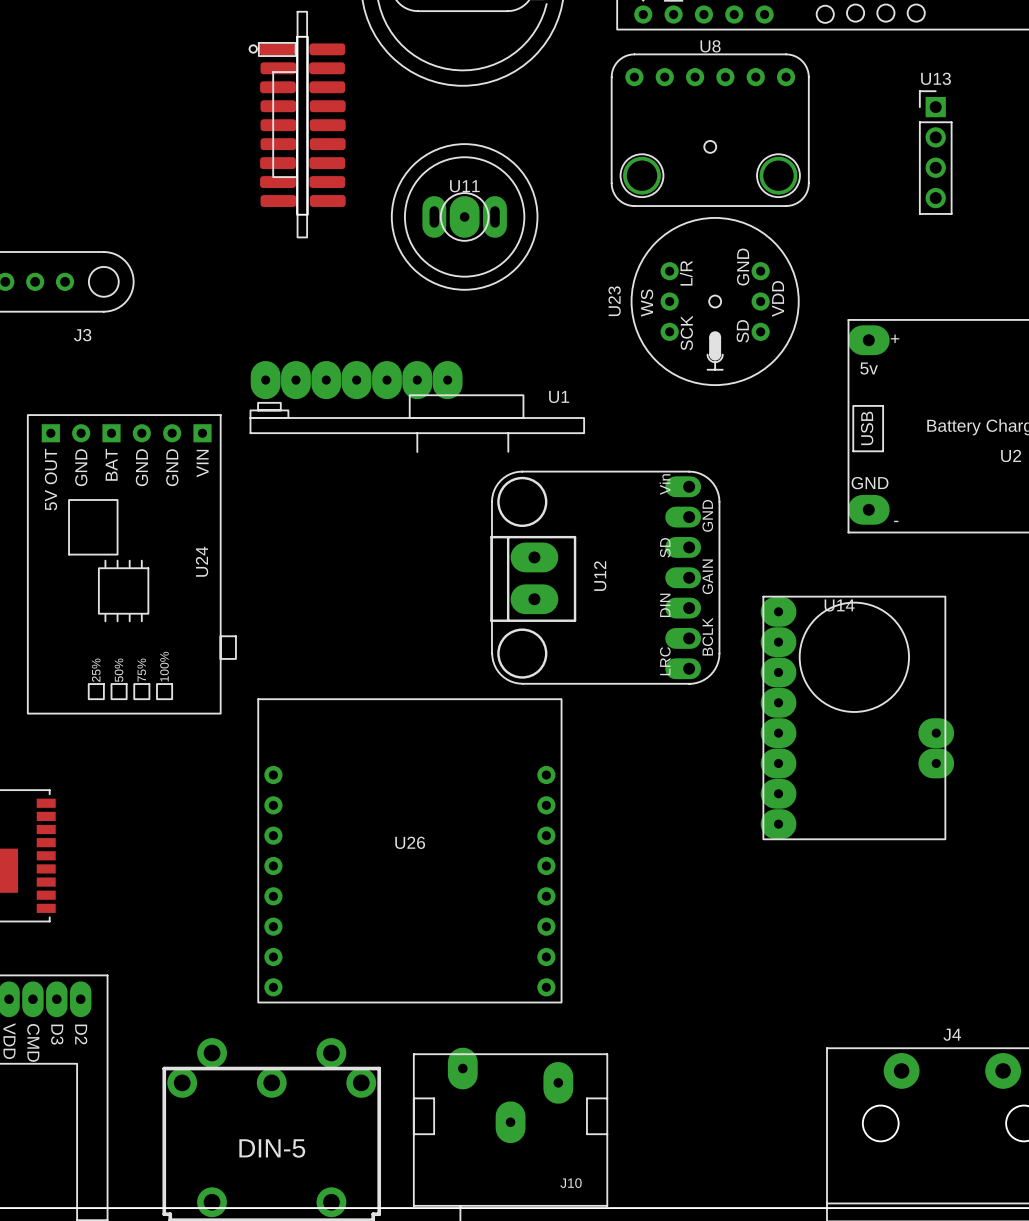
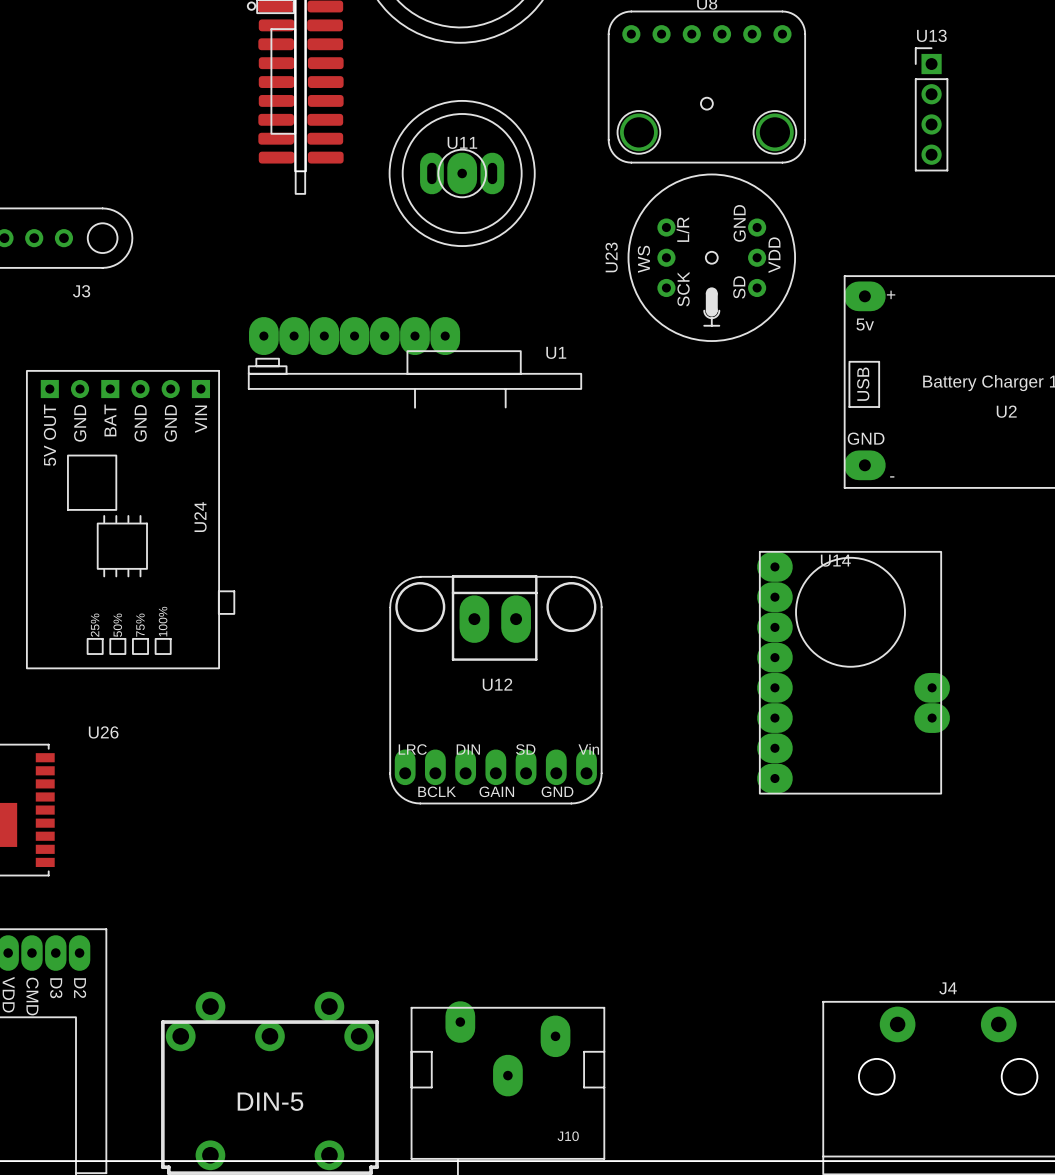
U12 rotation: 0° (605, 577) -> 90° clockwise (495, 689)
U12 position: (605, 577) -> (495, 689)
U26 footprint: [257, 698, 563, 1004] -> [88, 726, 119, 739]

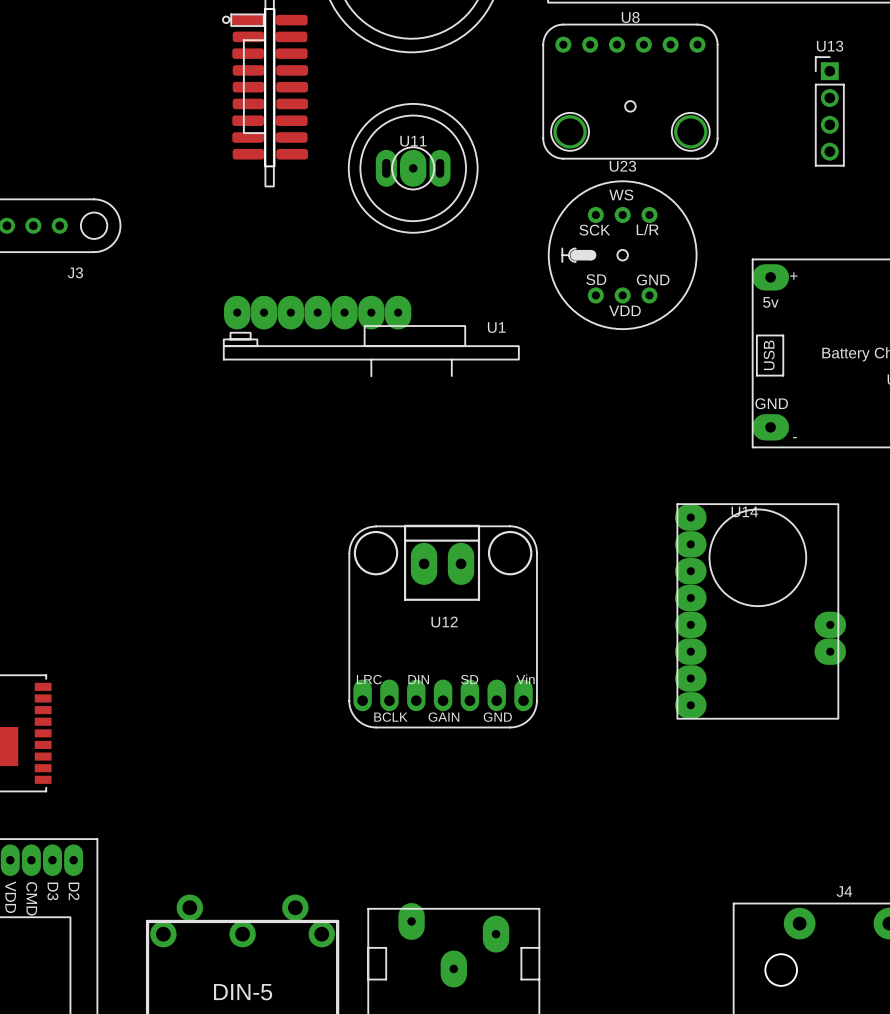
U23 rotation: 0° (711, 257) -> 90° clockwise (622, 255)
U24: (130, 519) -> none
U26: (103, 732) -> none

